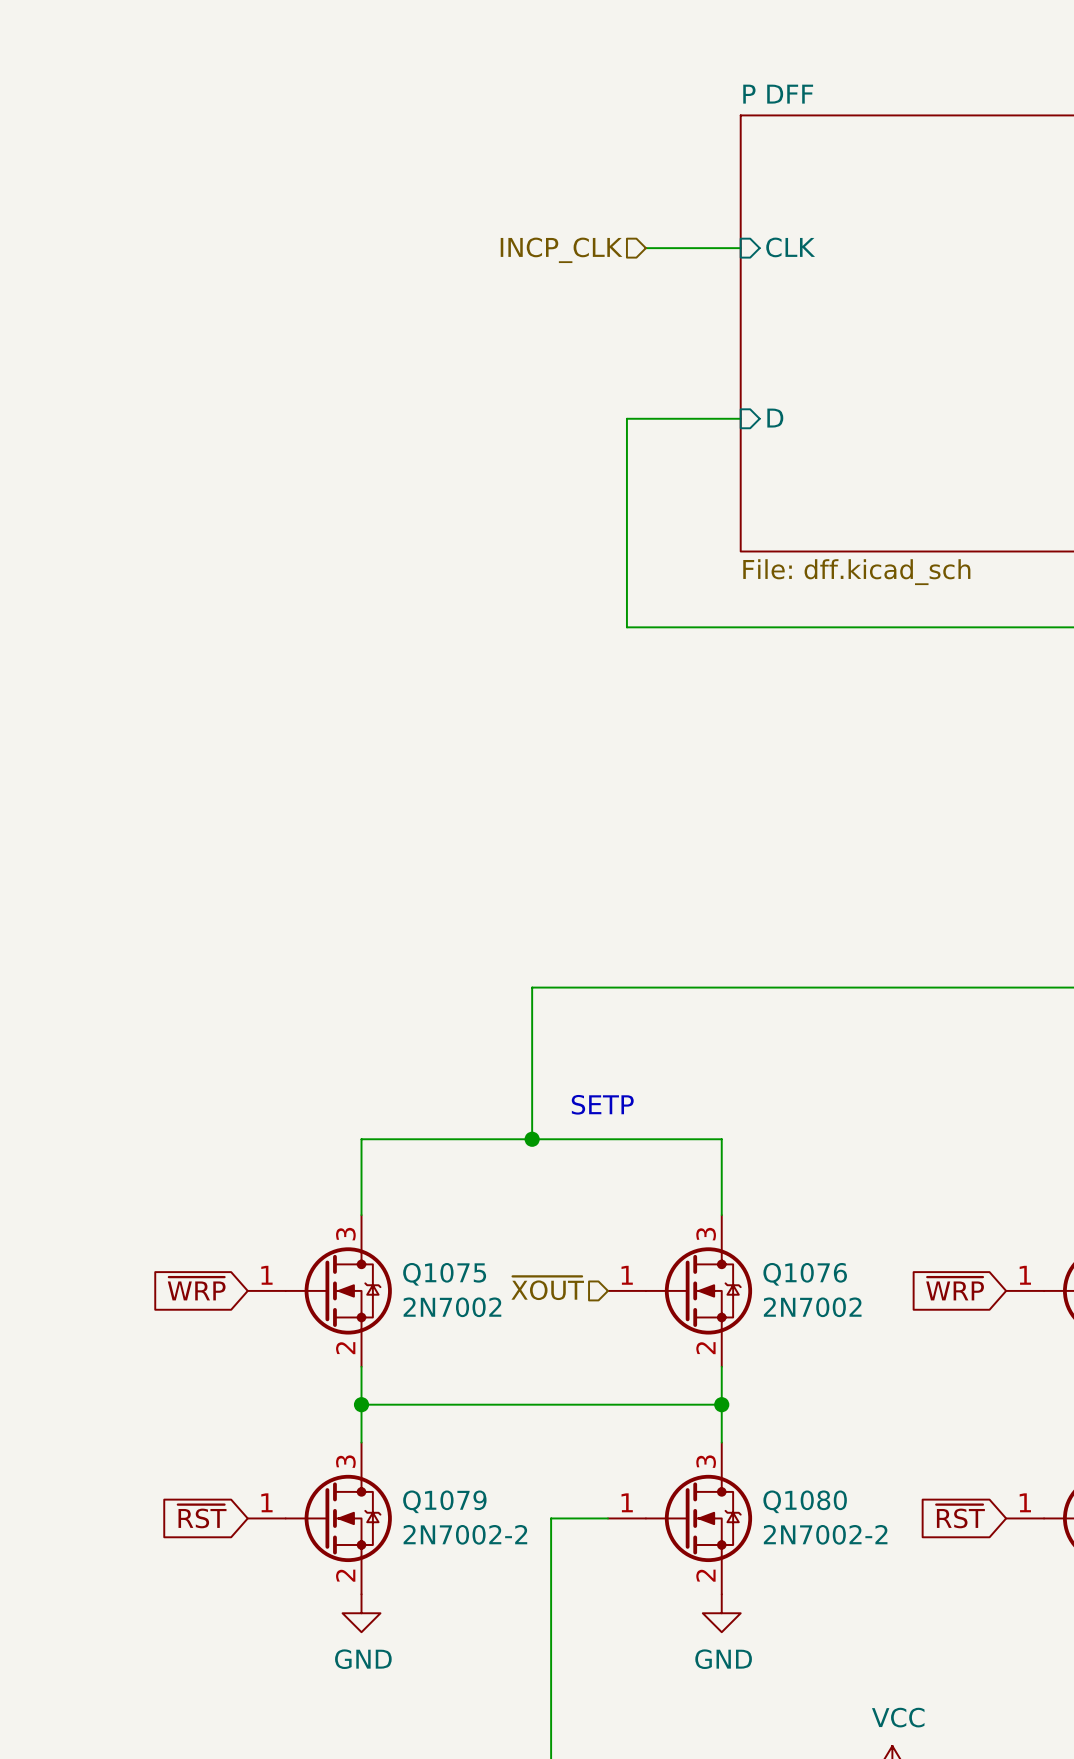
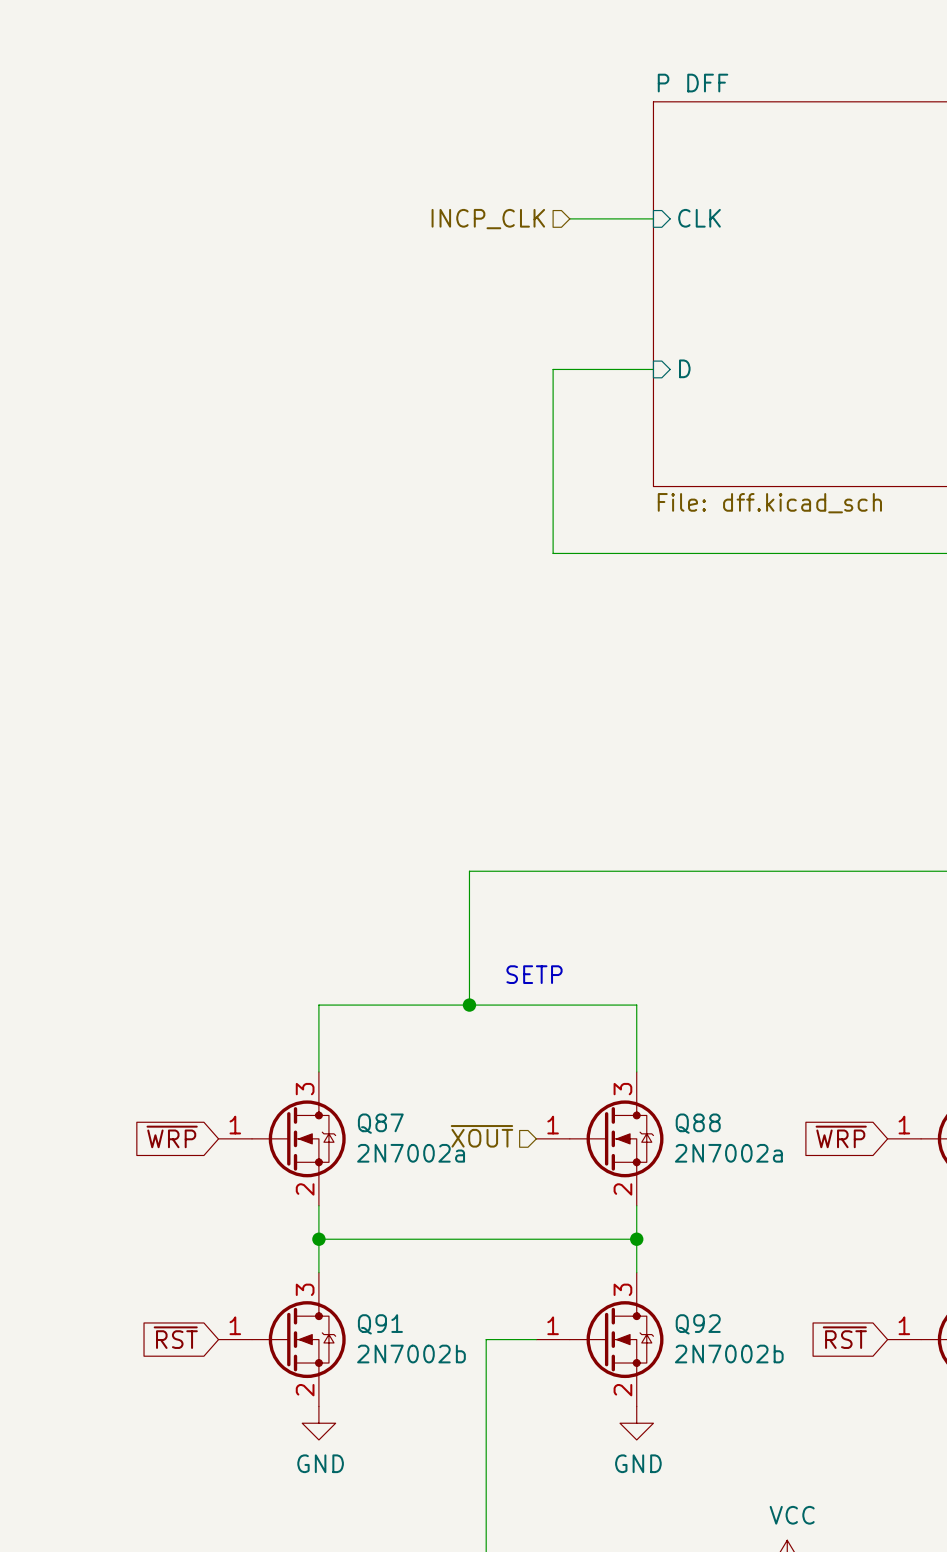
Q1075 name: Q1075 (444, 1274) -> Q87 (380, 1123)
Q1076 name: Q1076 (805, 1274) -> Q88 (698, 1123)
Q1075 value: 2N7002 (452, 1307) -> 2N7002a (411, 1153)
Q1076 value: 2N7002 (812, 1307) -> 2N7002a (728, 1153)
Q1079 name: Q1079 (444, 1501) -> Q91 (380, 1324)
Q1080 name: Q1080 (805, 1501) -> Q92 (698, 1324)
Q1079 value: 2N7002-2 (465, 1534) -> 2N7002b (411, 1354)
Q1080 value: 2N7002-2 (825, 1534) -> 2N7002b (729, 1354)

